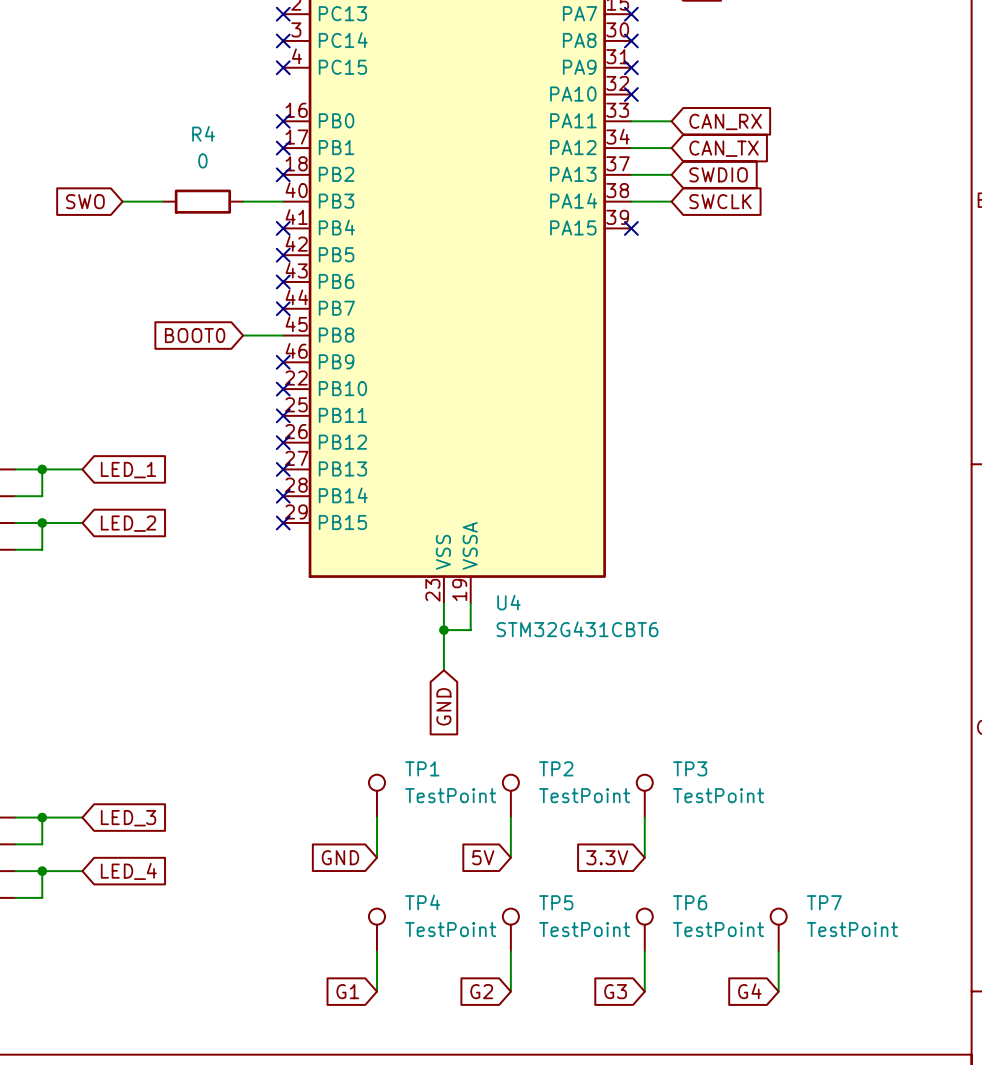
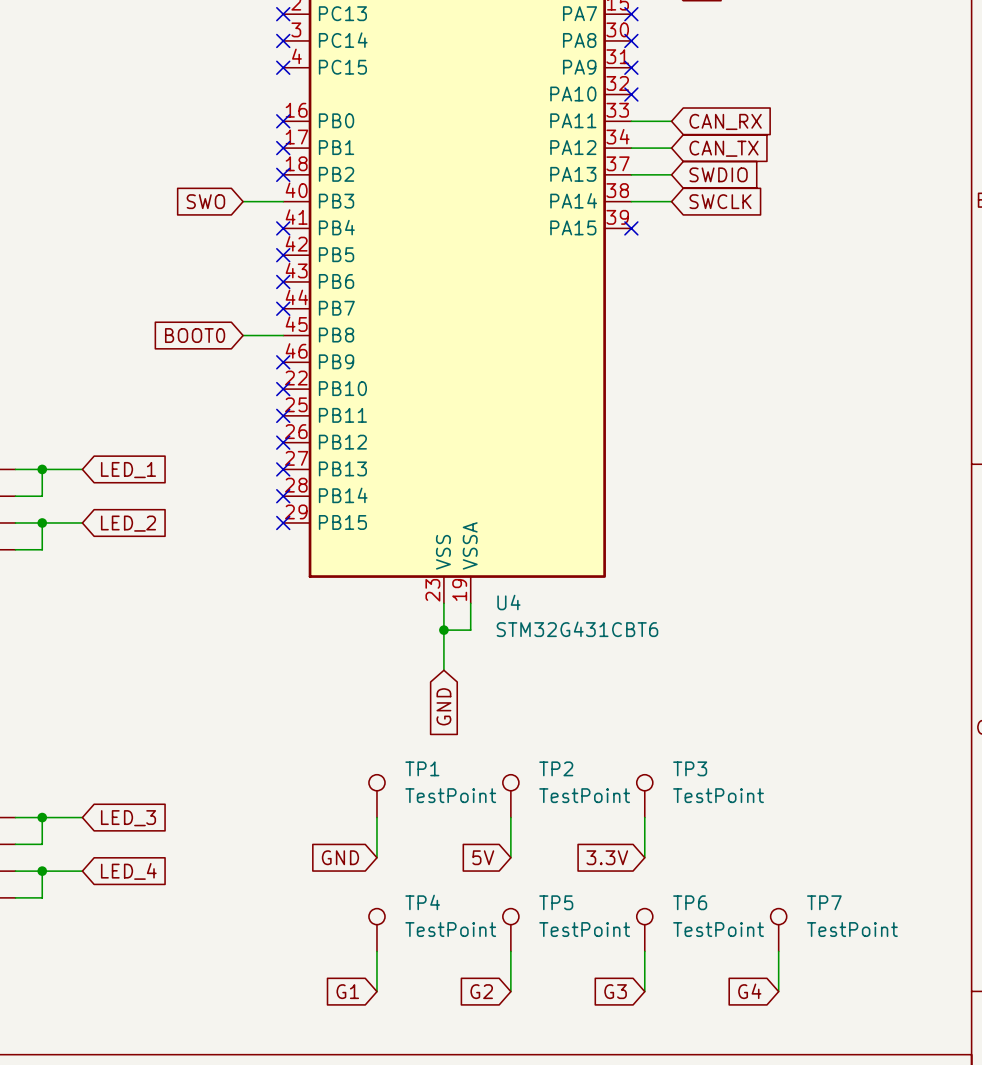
global label position: SWO (85, 201) -> SWO (205, 201)
wire: (122, 201) (162, 201) -> none
R4: 0 (202, 201) -> none

